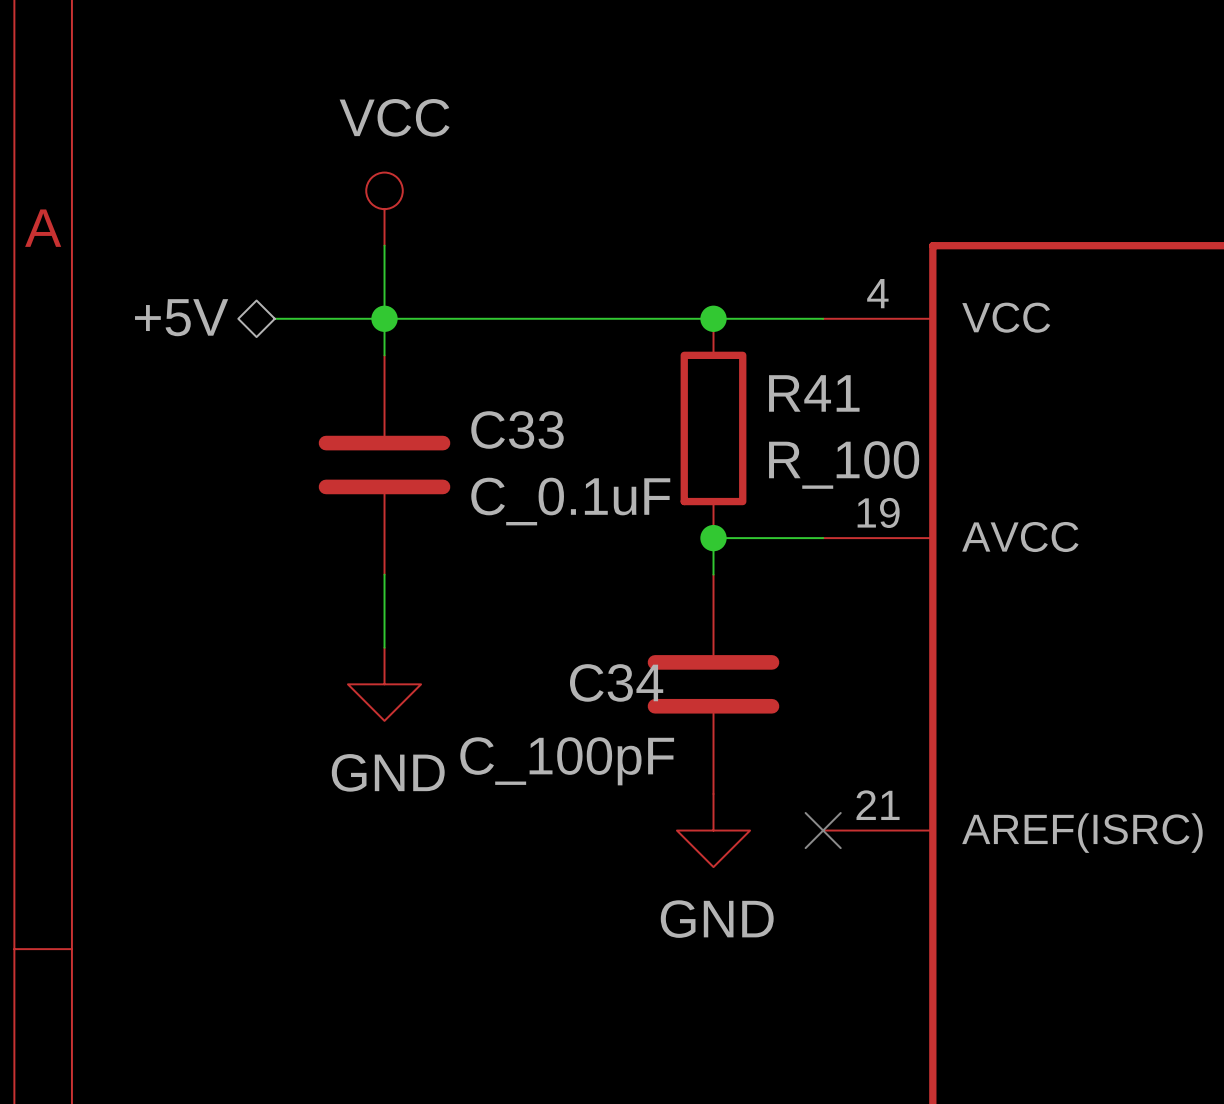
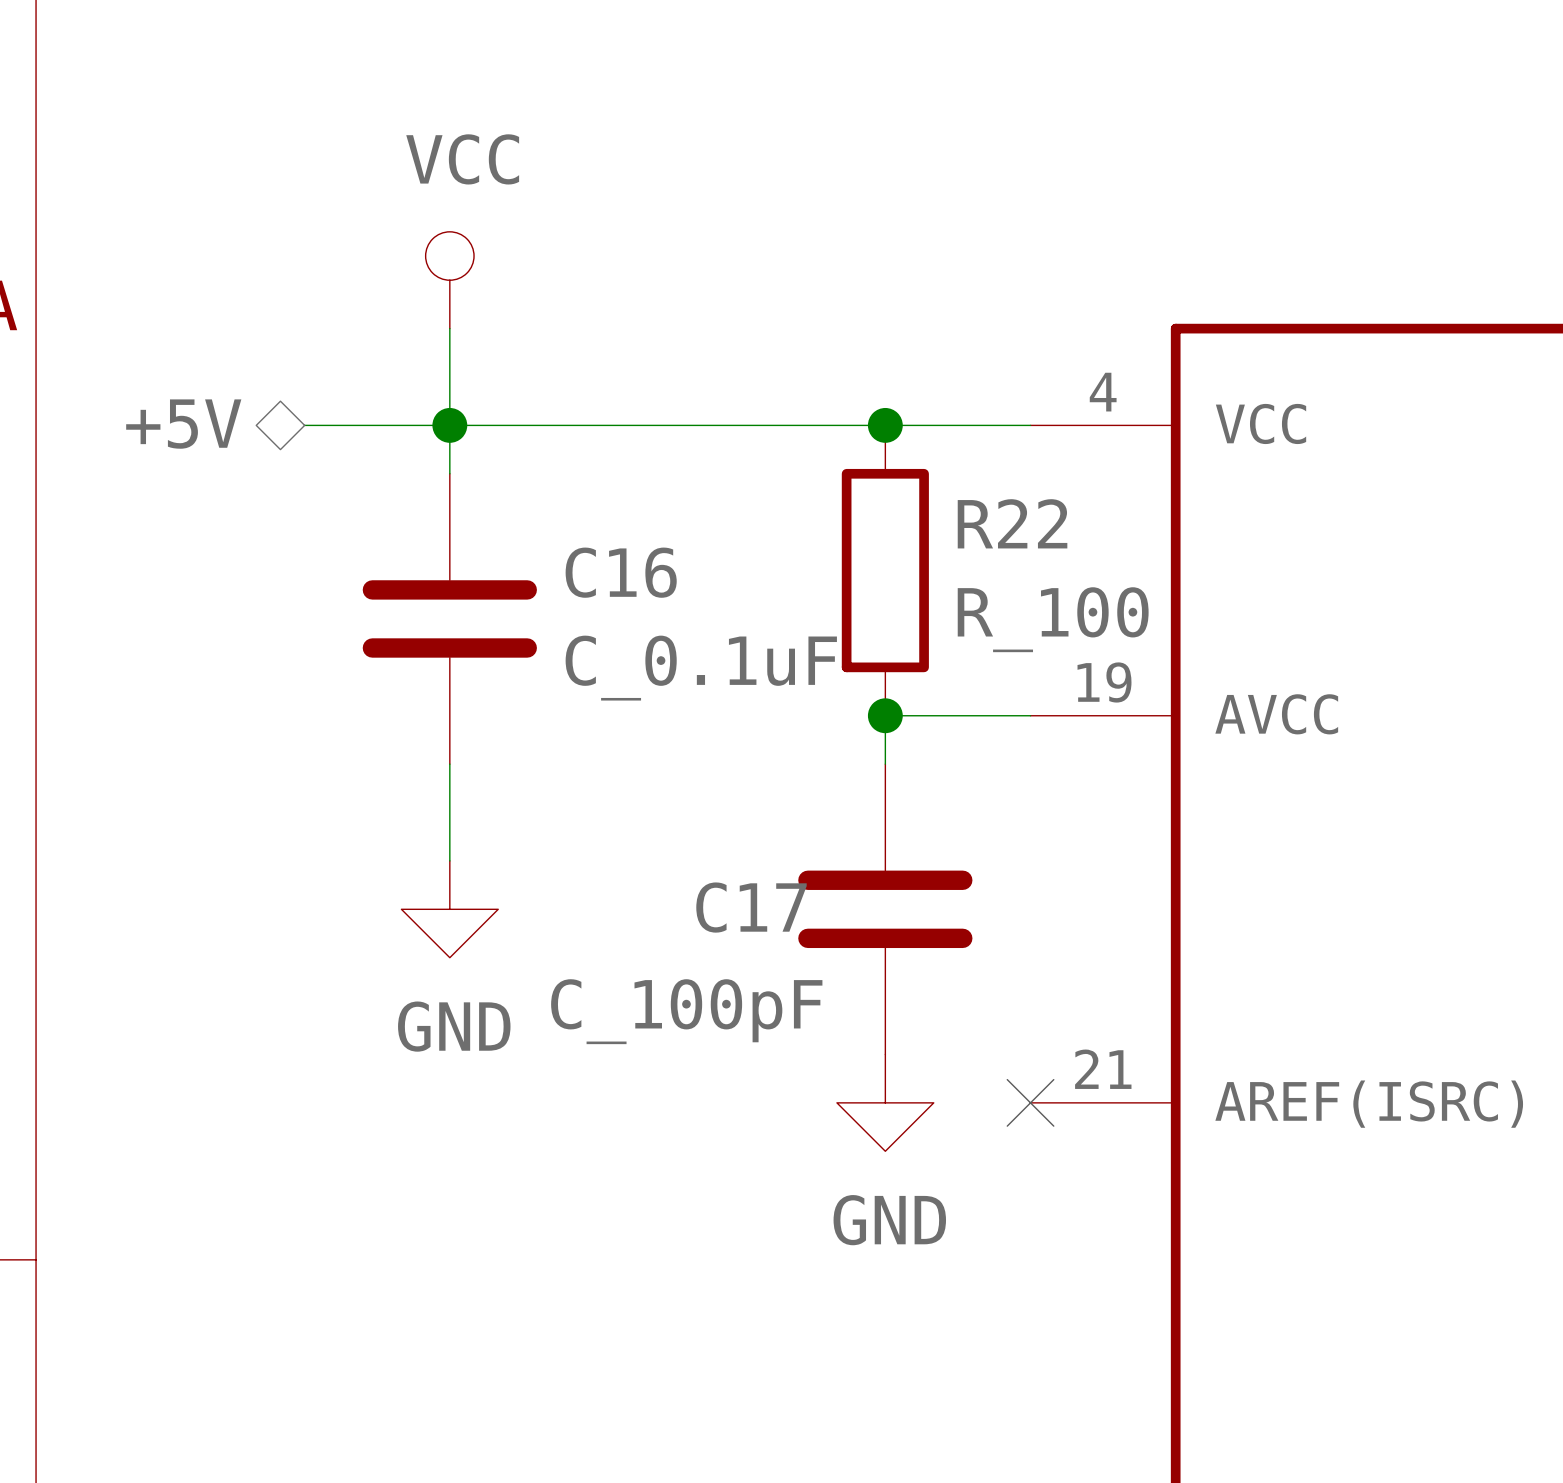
R41 name: R41 (814, 393) -> R22 (1012, 523)
C33 name: C33 (517, 429) -> C16 (621, 572)
C34 name: C34 (616, 682) -> C17 (751, 907)

